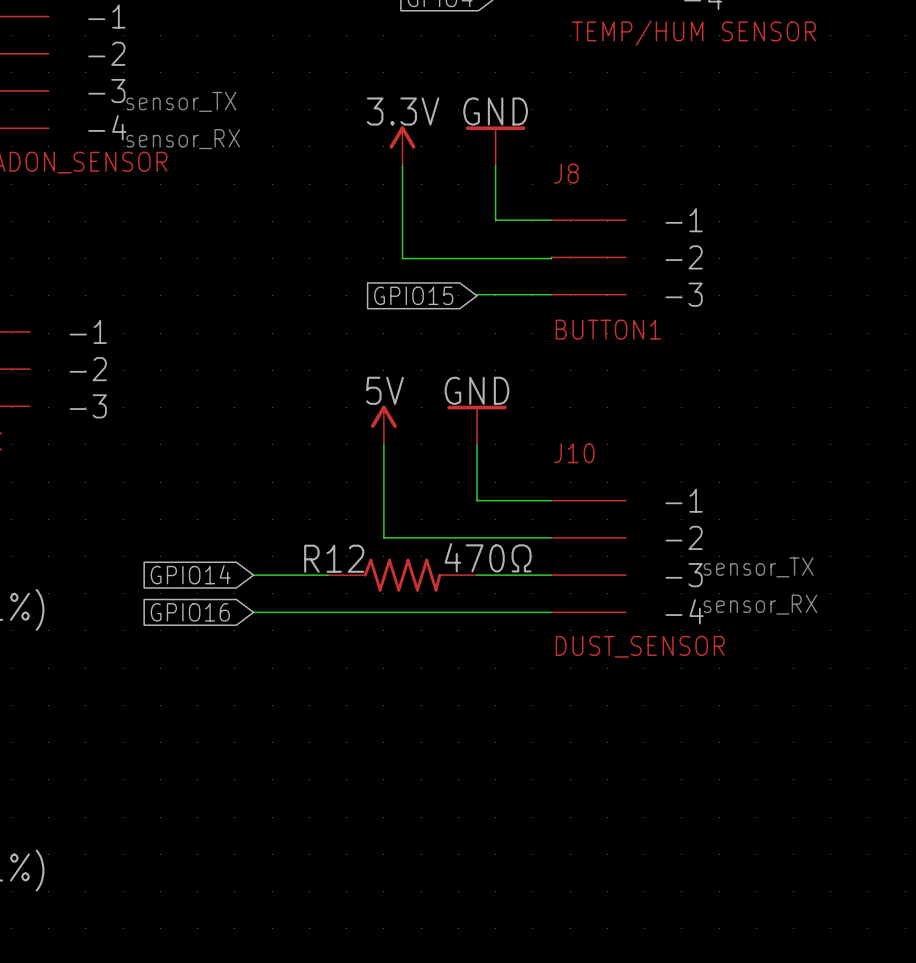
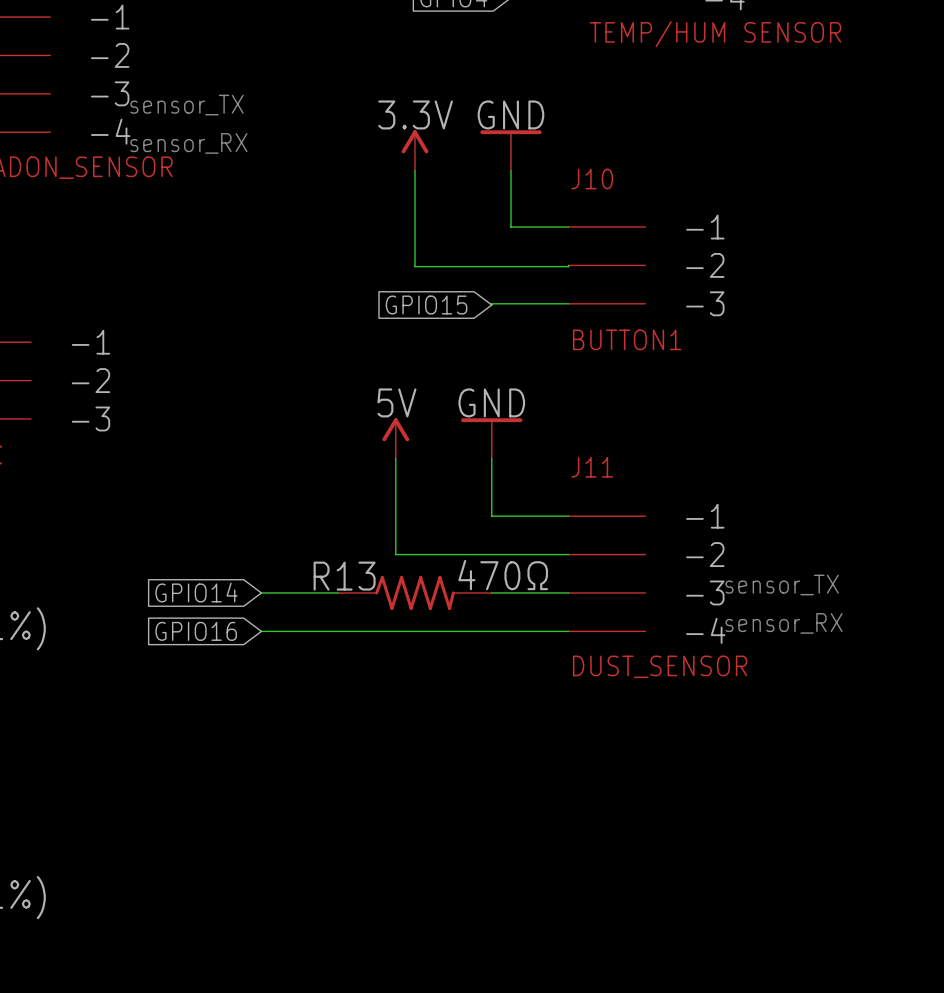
J8 name: J8 (566, 173) -> J10 (592, 179)
J10 name: J10 (574, 453) -> J11 (592, 467)
R12 name: R12 (334, 558) -> R13 (344, 576)

